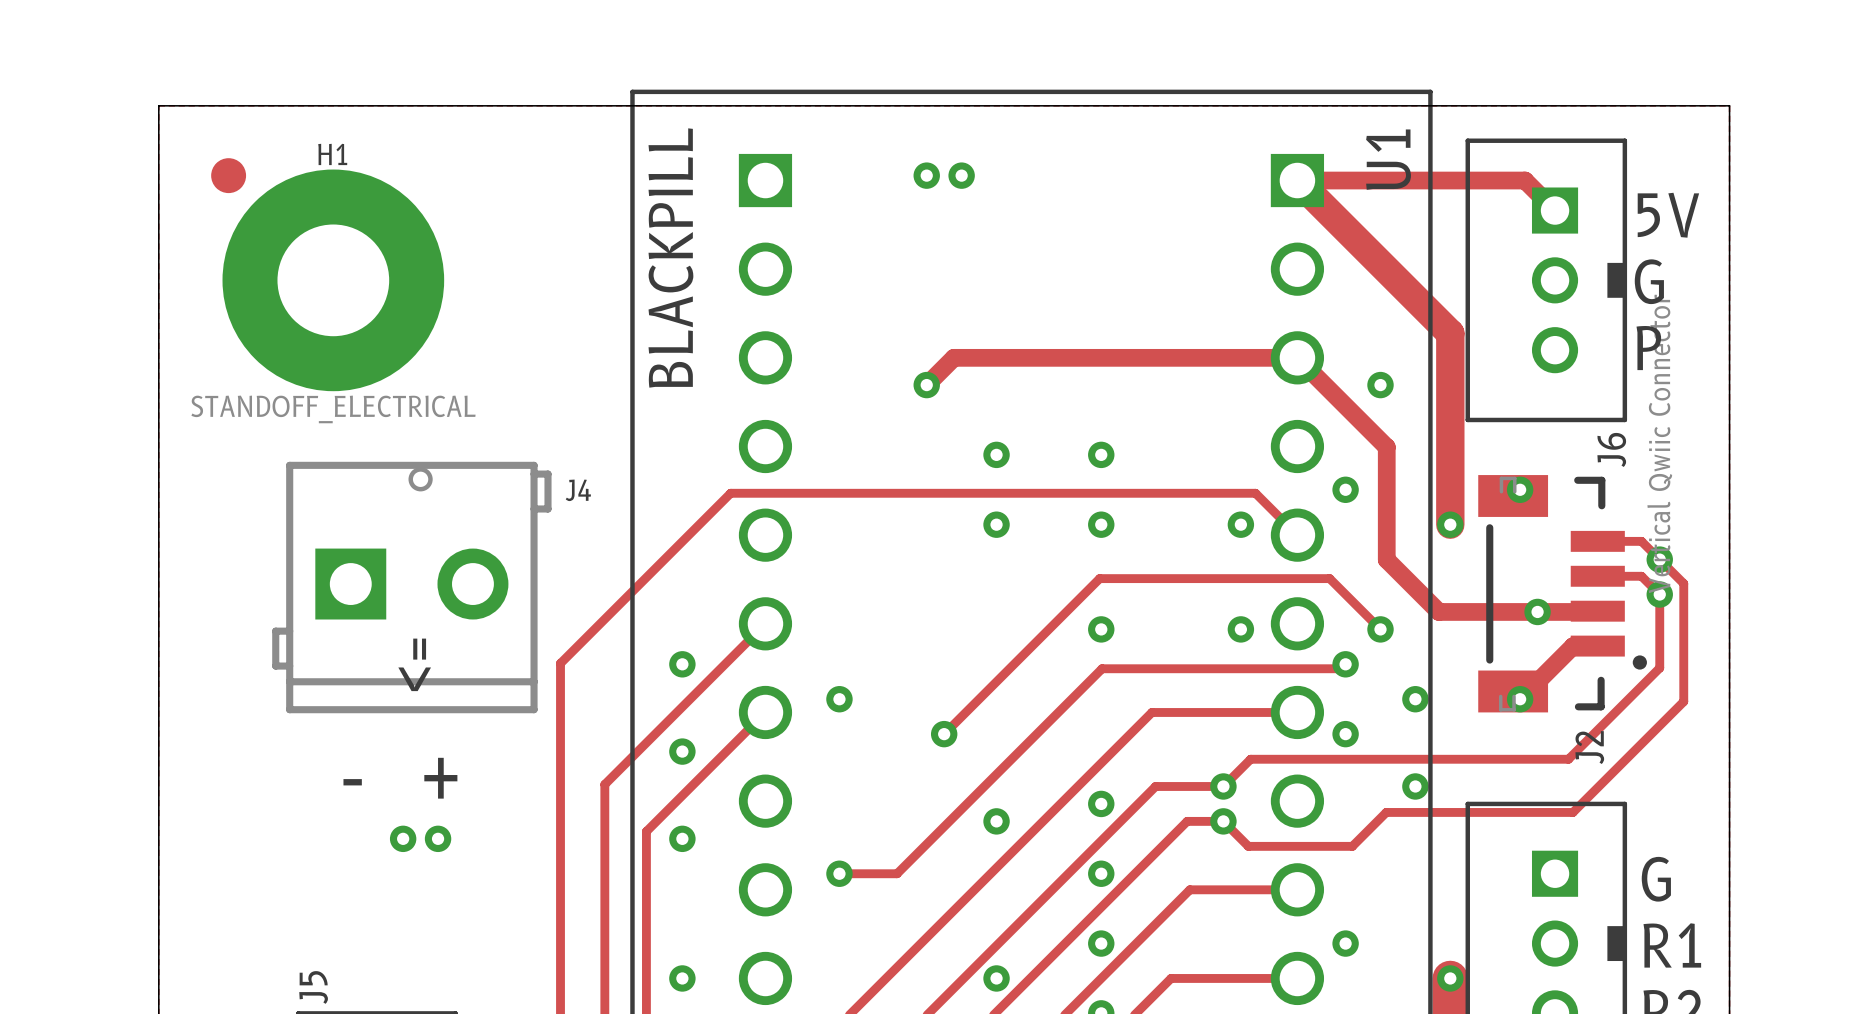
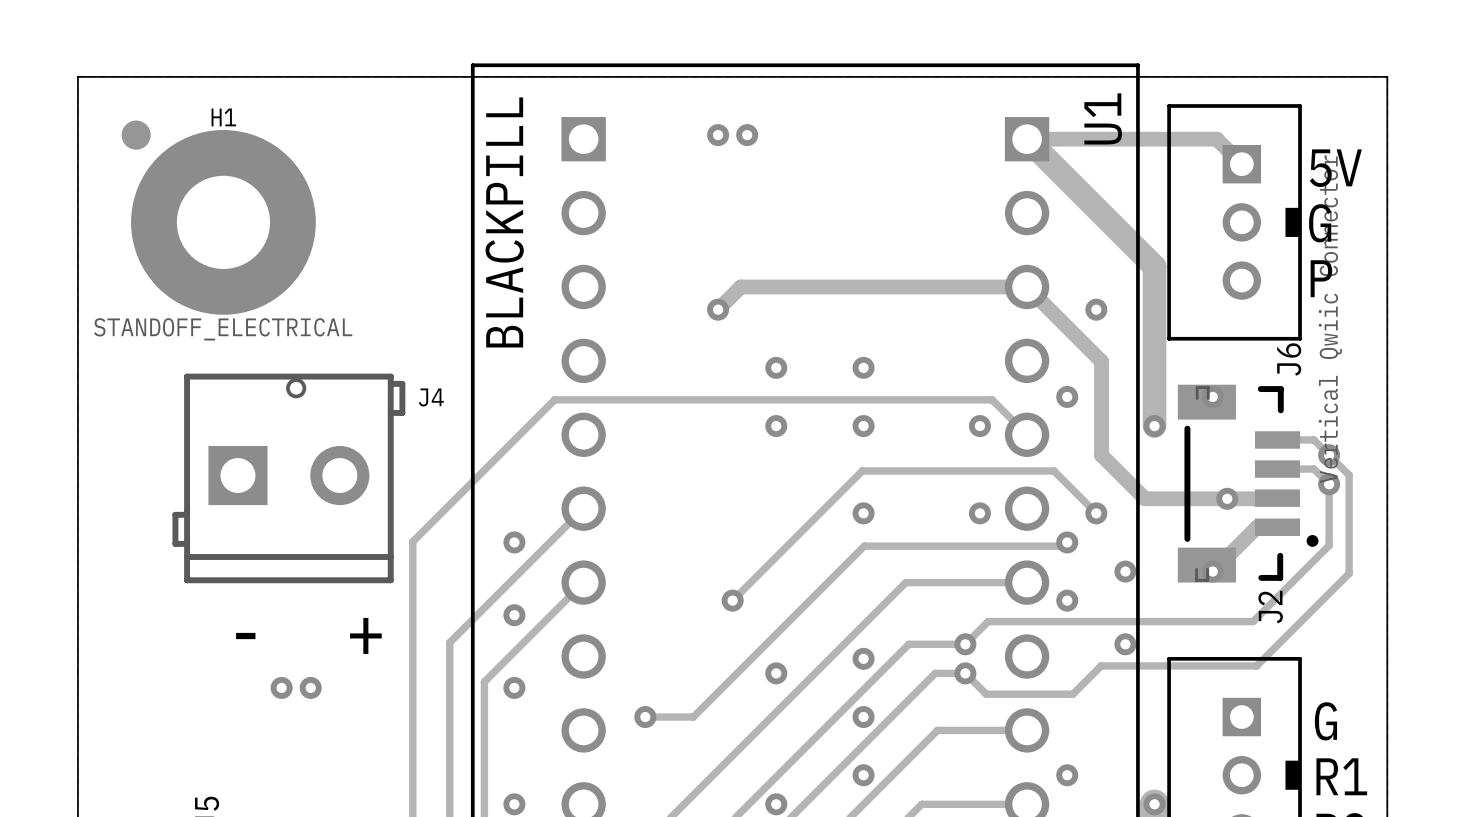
text: <= (414, 664) -> none
via: (839, 699) -> none

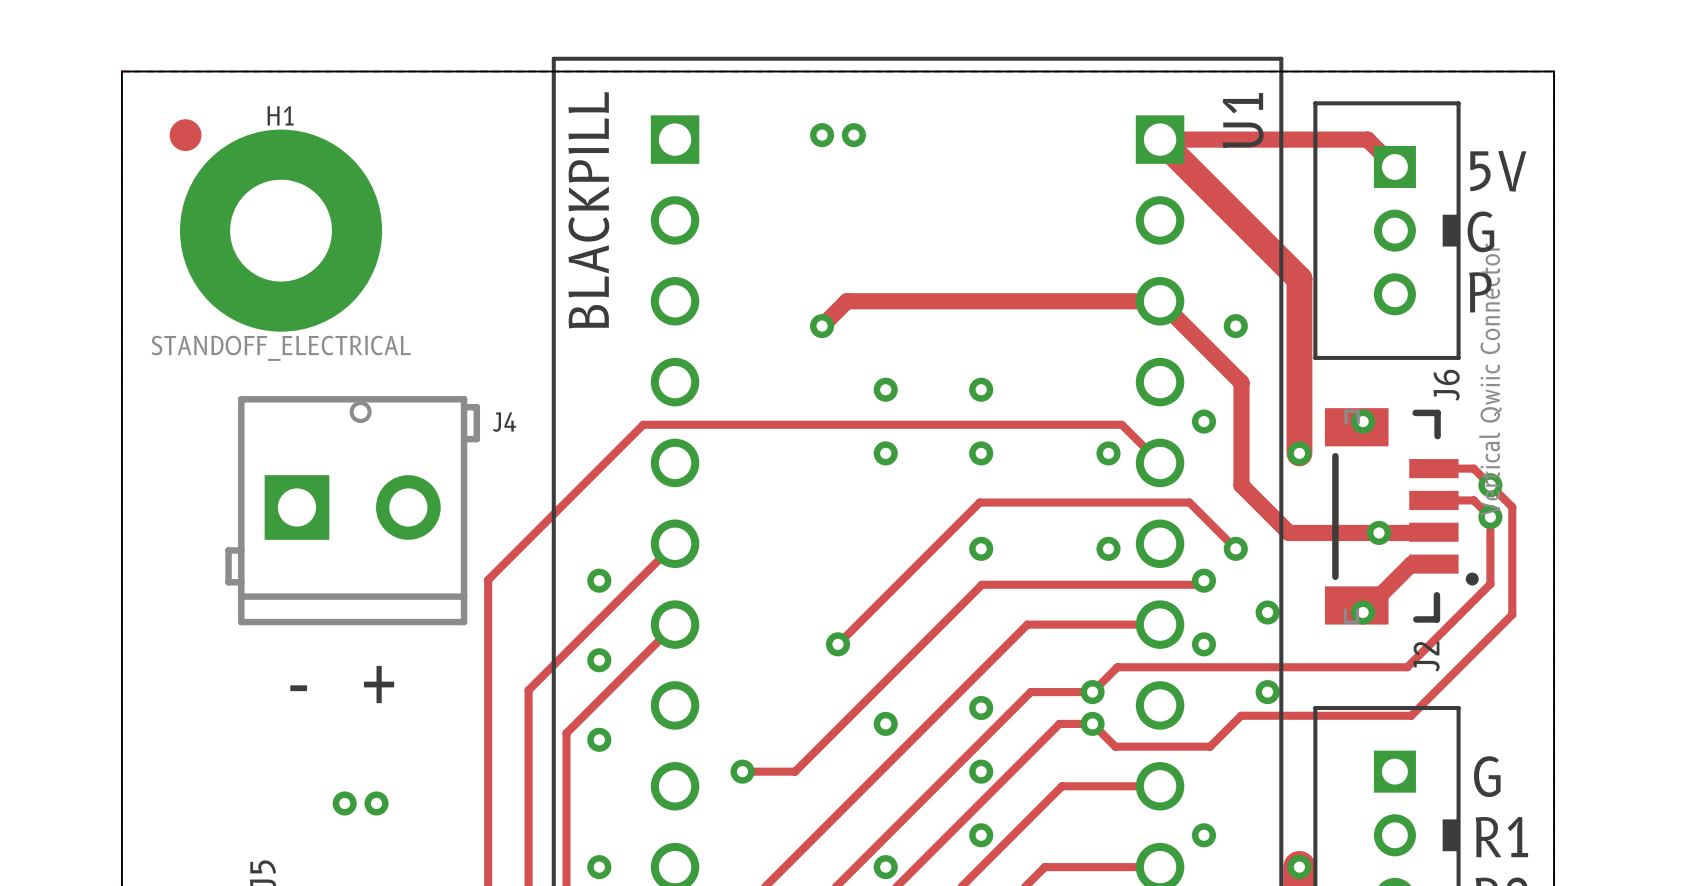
via: (281, 687) -> none
via: (310, 687) -> none
via: none -> (344, 803)
via: none -> (376, 803)

